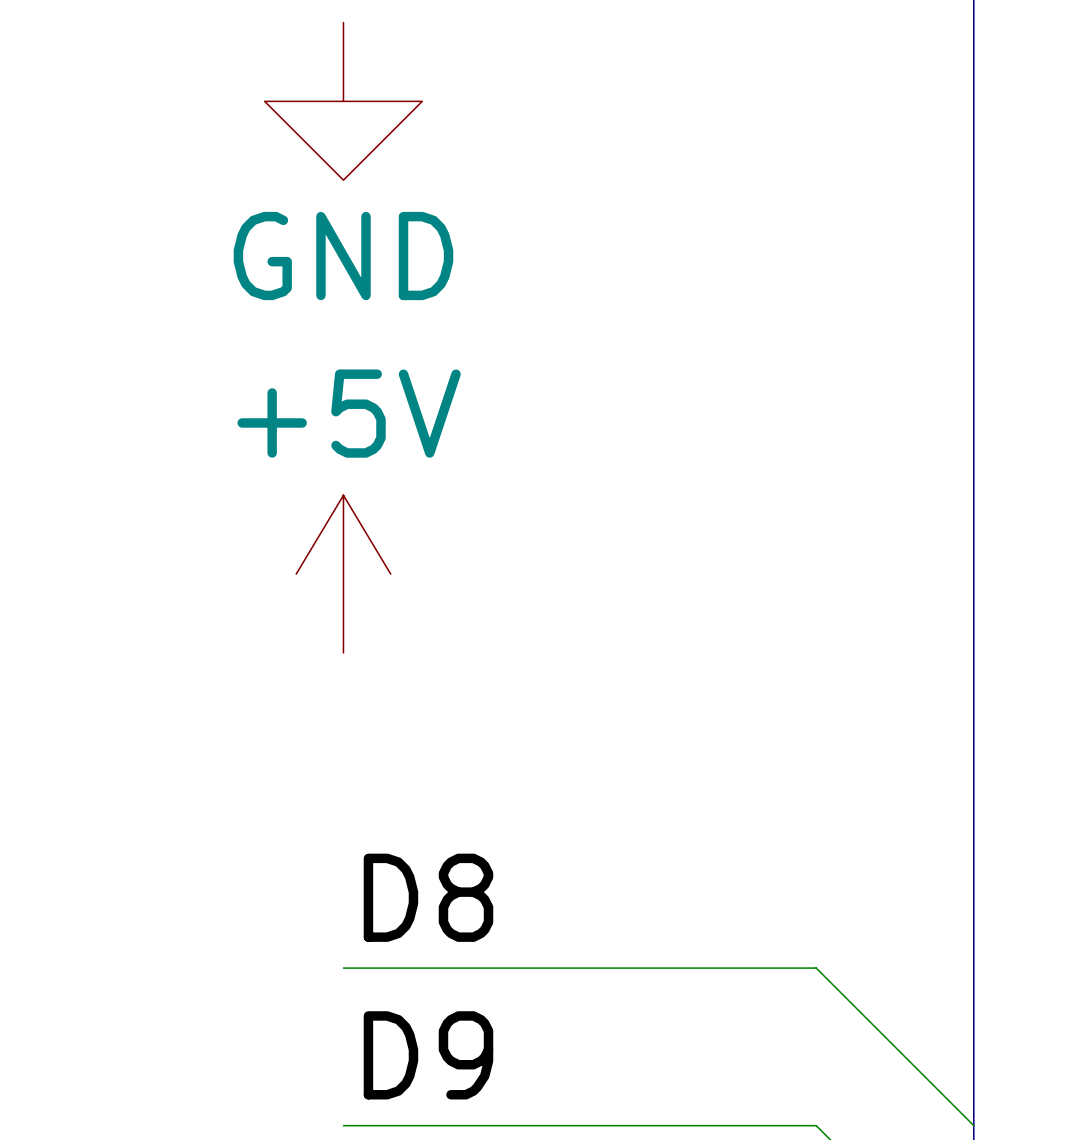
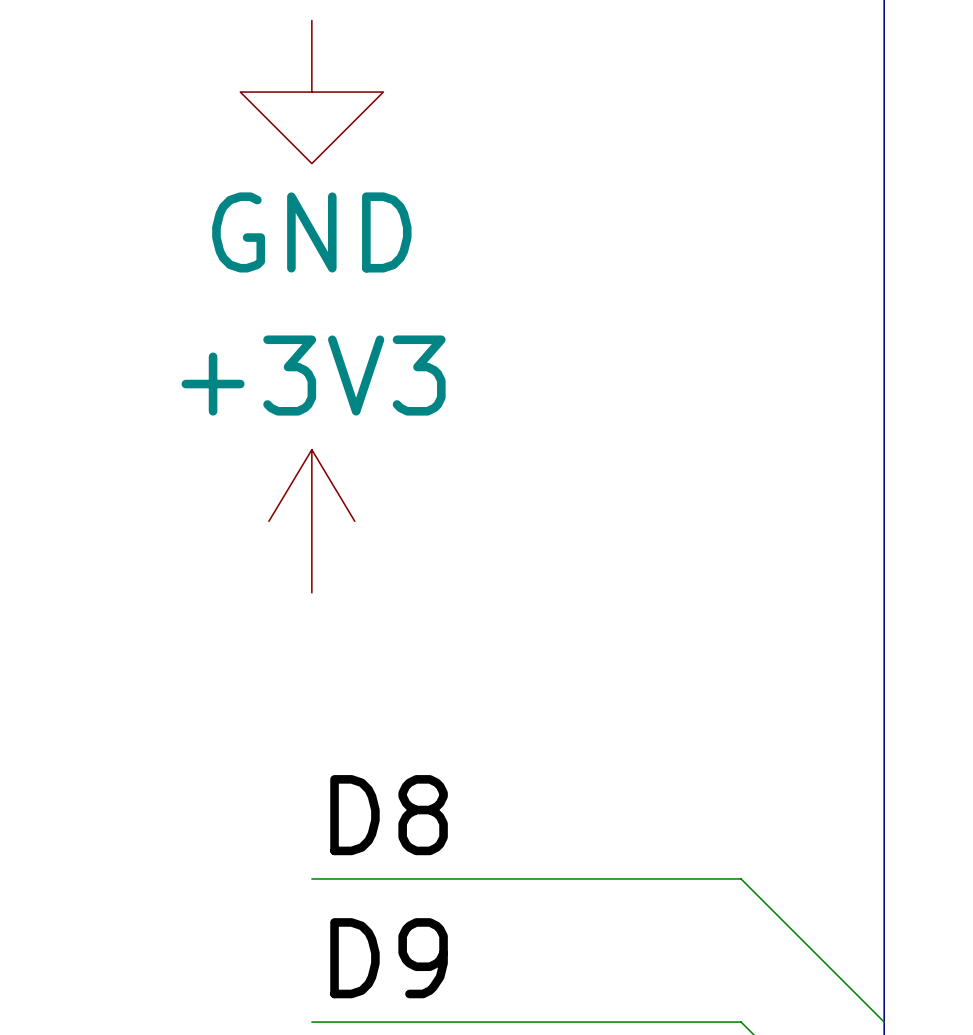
power symbol: +5V (343, 574) -> +3V3 (311, 521)

